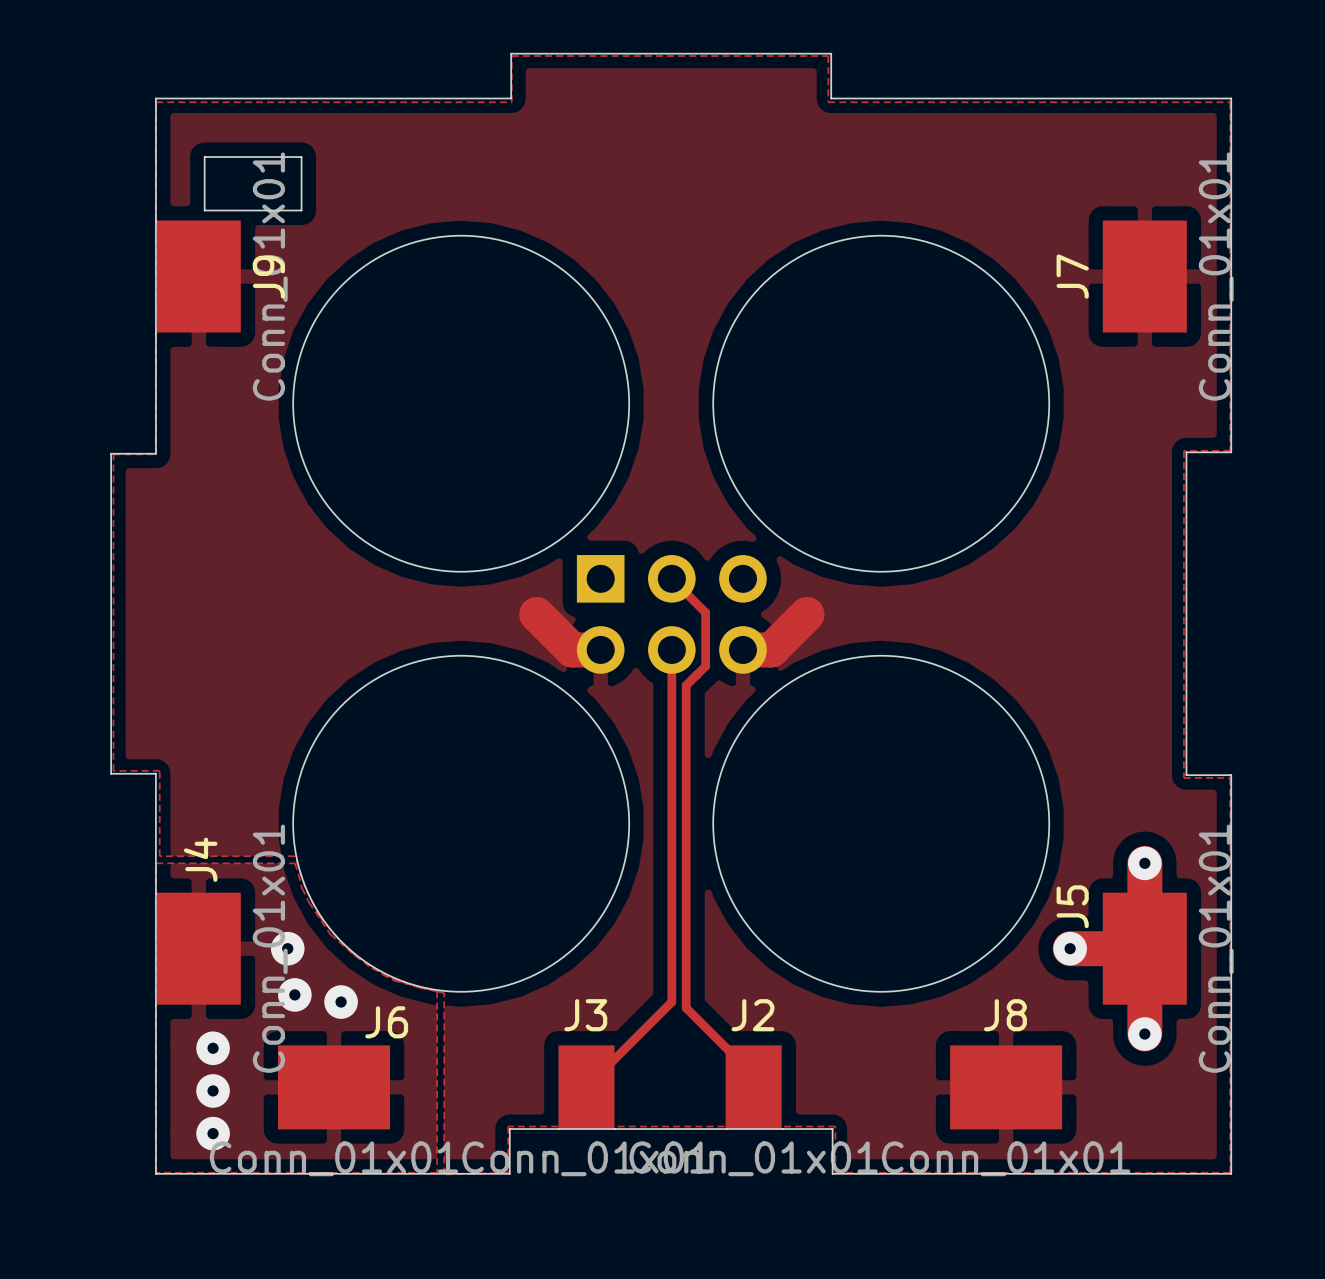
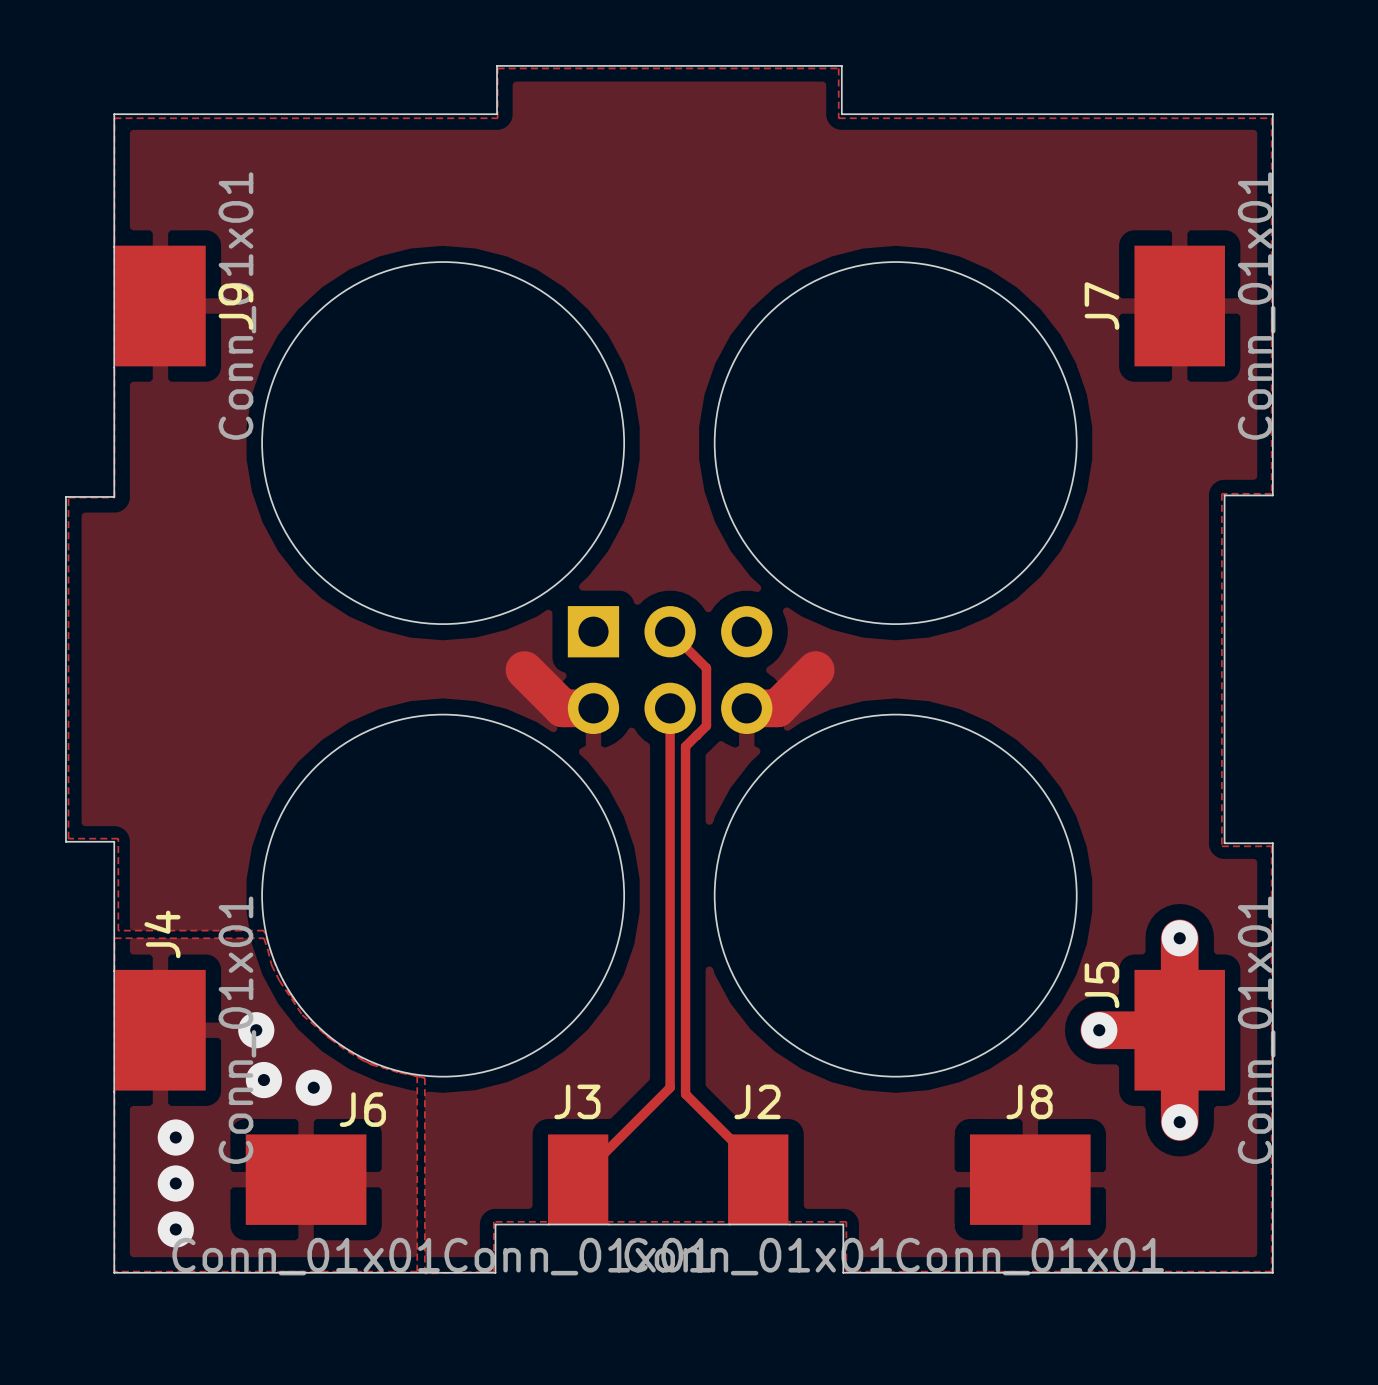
board edge: (204, 157) (301, 157) (301, 210) (204, 210) (204, 157) -> none

